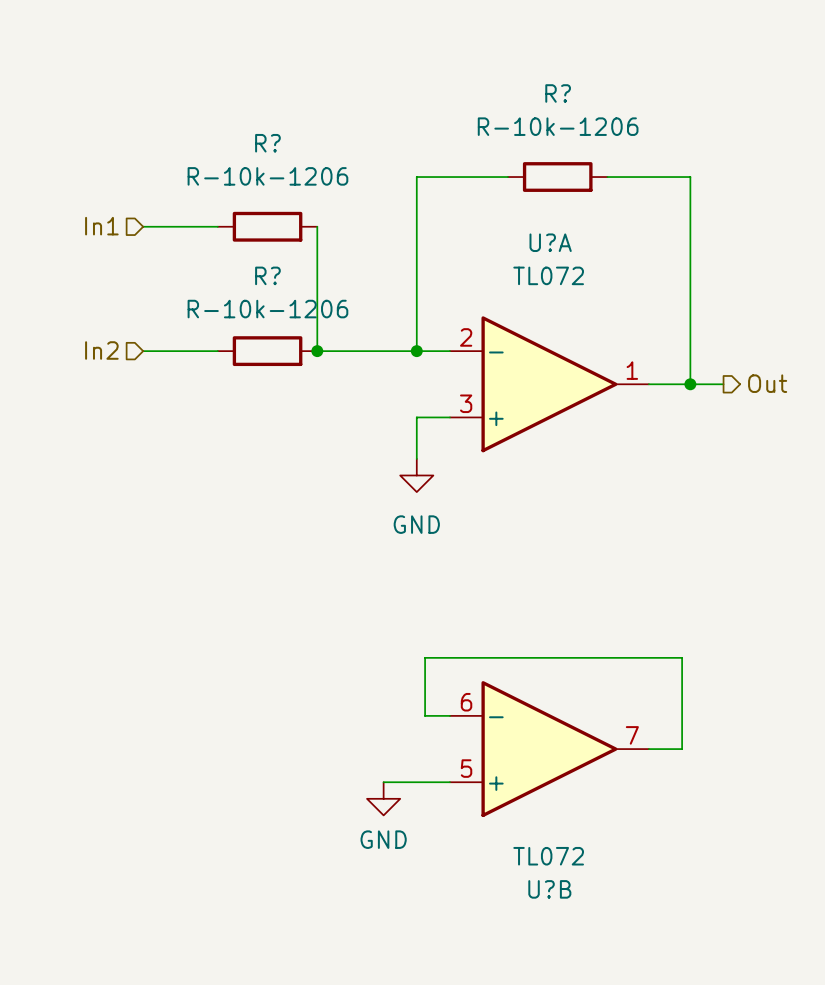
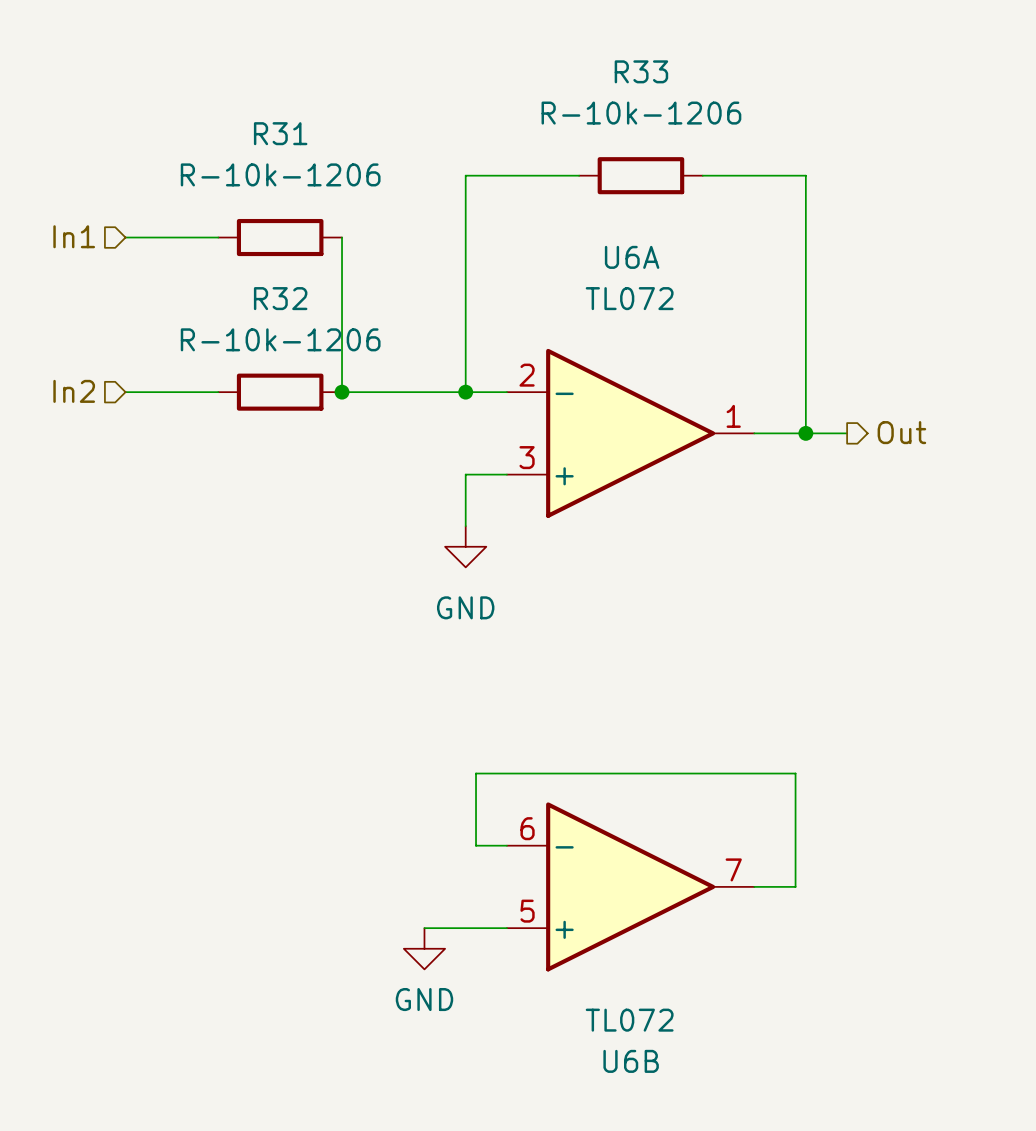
R? name: R? (558, 93) -> R33 (641, 71)
R? name: R? (267, 143) -> R31 (280, 133)
U?A name: U?A (550, 242) -> U6A (632, 257)
R? name: R? (267, 275) -> R32 (280, 298)
U?B name: U?B (549, 889) -> U6B (631, 1061)

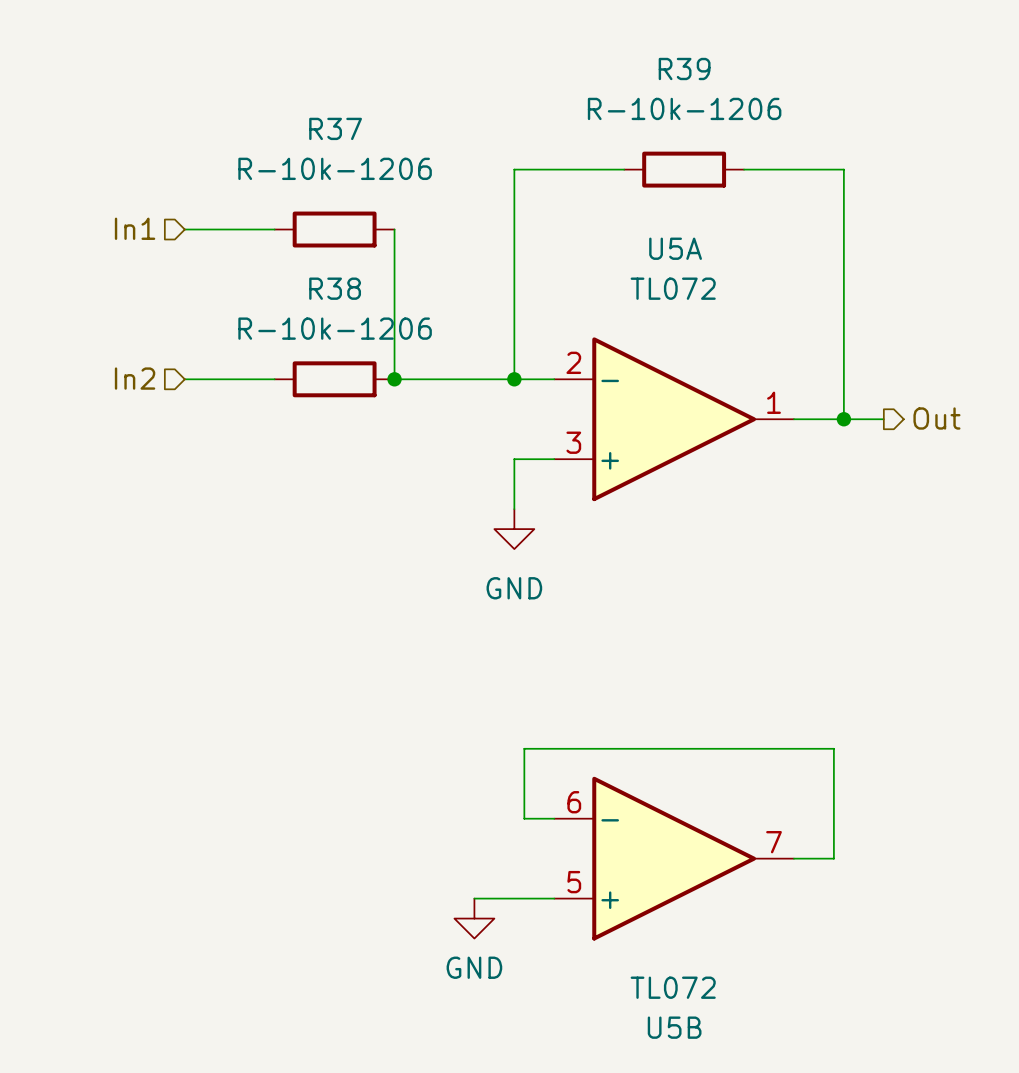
R33 name: R33 (641, 71) -> R39 (684, 68)
R31 name: R31 (280, 133) -> R37 (335, 128)
U6A name: U6A (632, 257) -> U5A (675, 248)
R32 name: R32 (280, 298) -> R38 (335, 288)
U6B name: U6B (631, 1061) -> U5B (674, 1027)

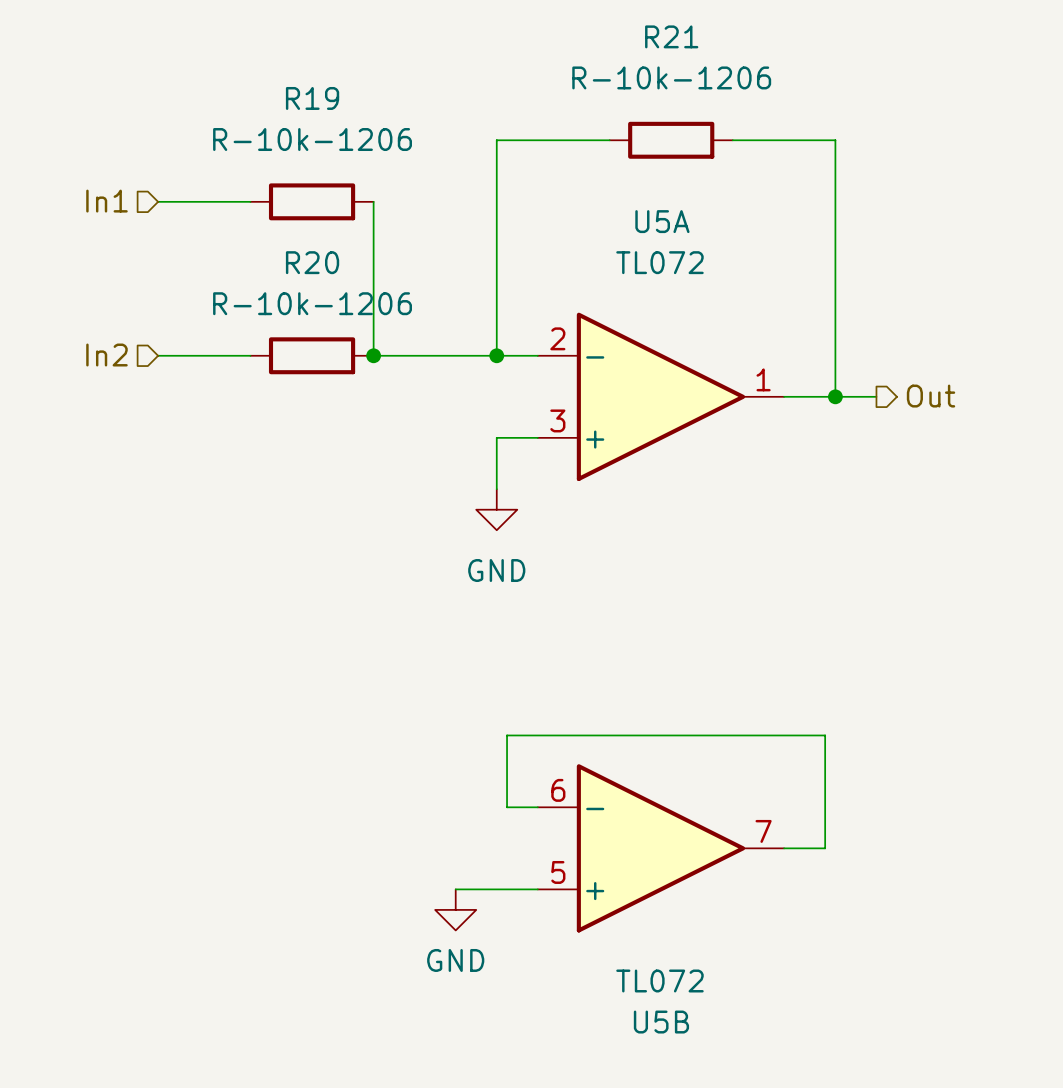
R39 name: R39 (684, 68) -> R21 (671, 36)
R37 name: R37 (335, 128) -> R19 (312, 98)
R38 name: R38 (335, 288) -> R20 (312, 262)

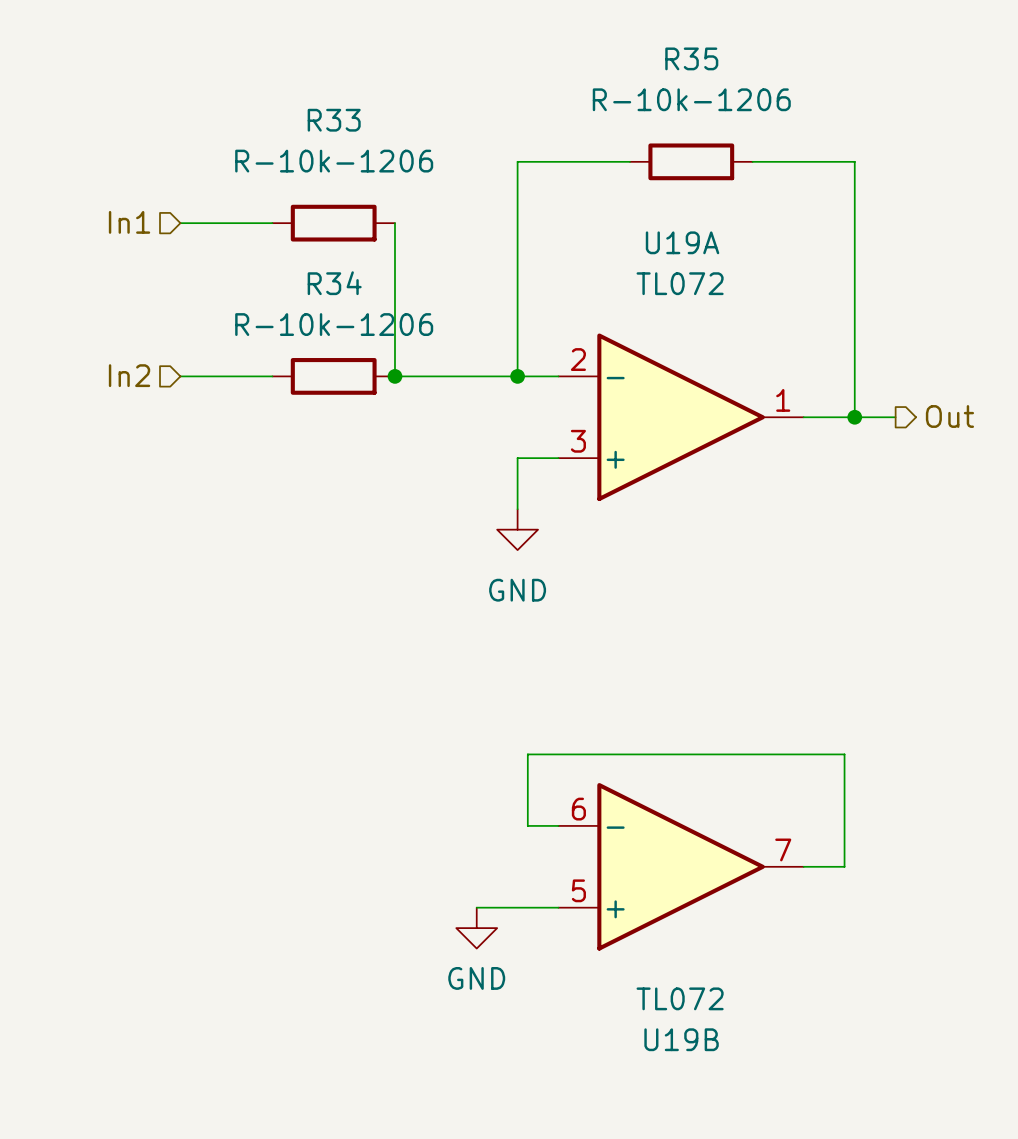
R21 name: R21 (671, 36) -> R35 (691, 58)
R19 name: R19 (312, 98) -> R33 (334, 120)
U5A name: U5A (662, 221) -> U19A (682, 242)
R20 name: R20 (312, 262) -> R34 (334, 283)
U5B name: U5B (661, 1022) -> U19B (681, 1039)

